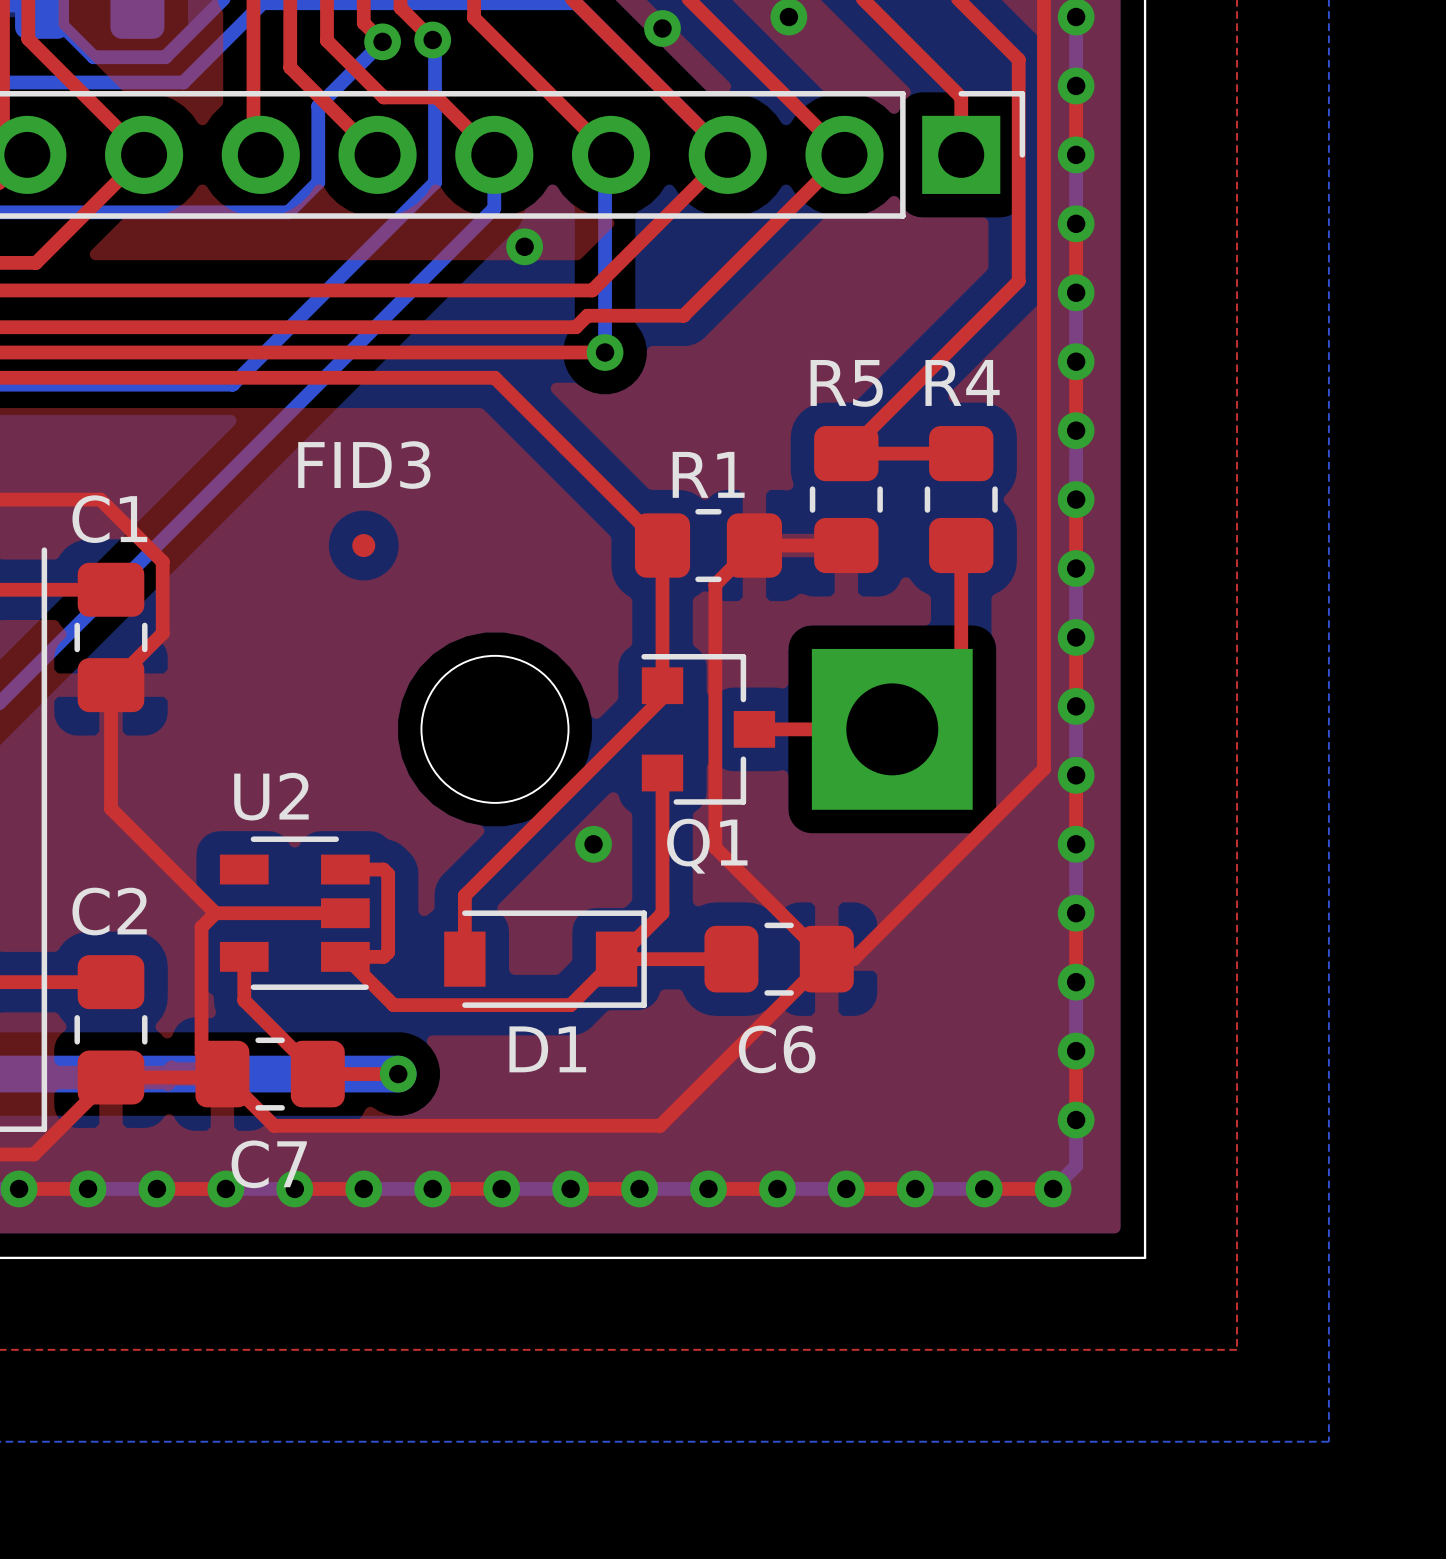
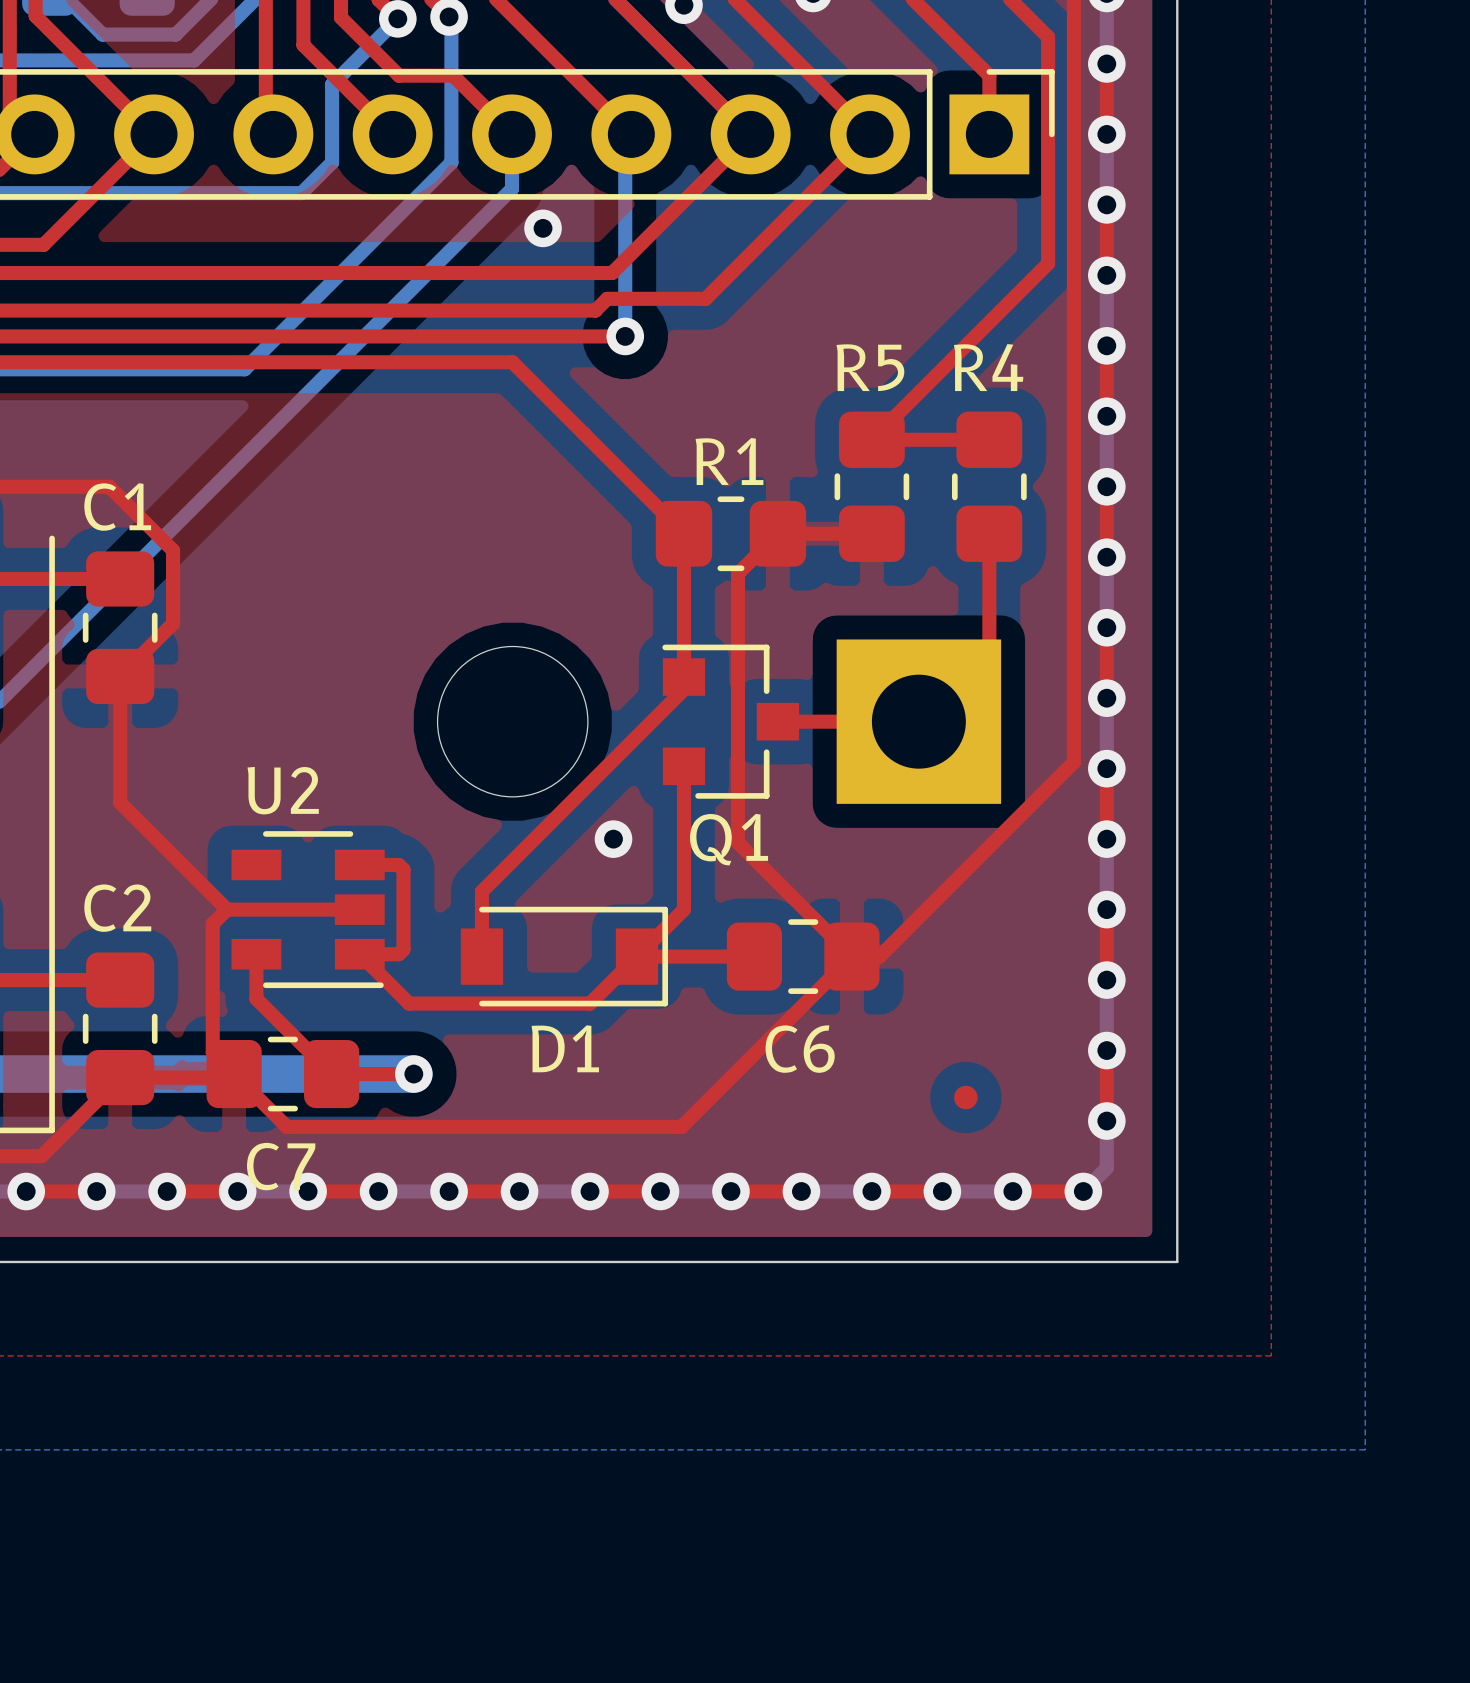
FID3: (363, 545) -> none
part: none -> (965, 1097)

